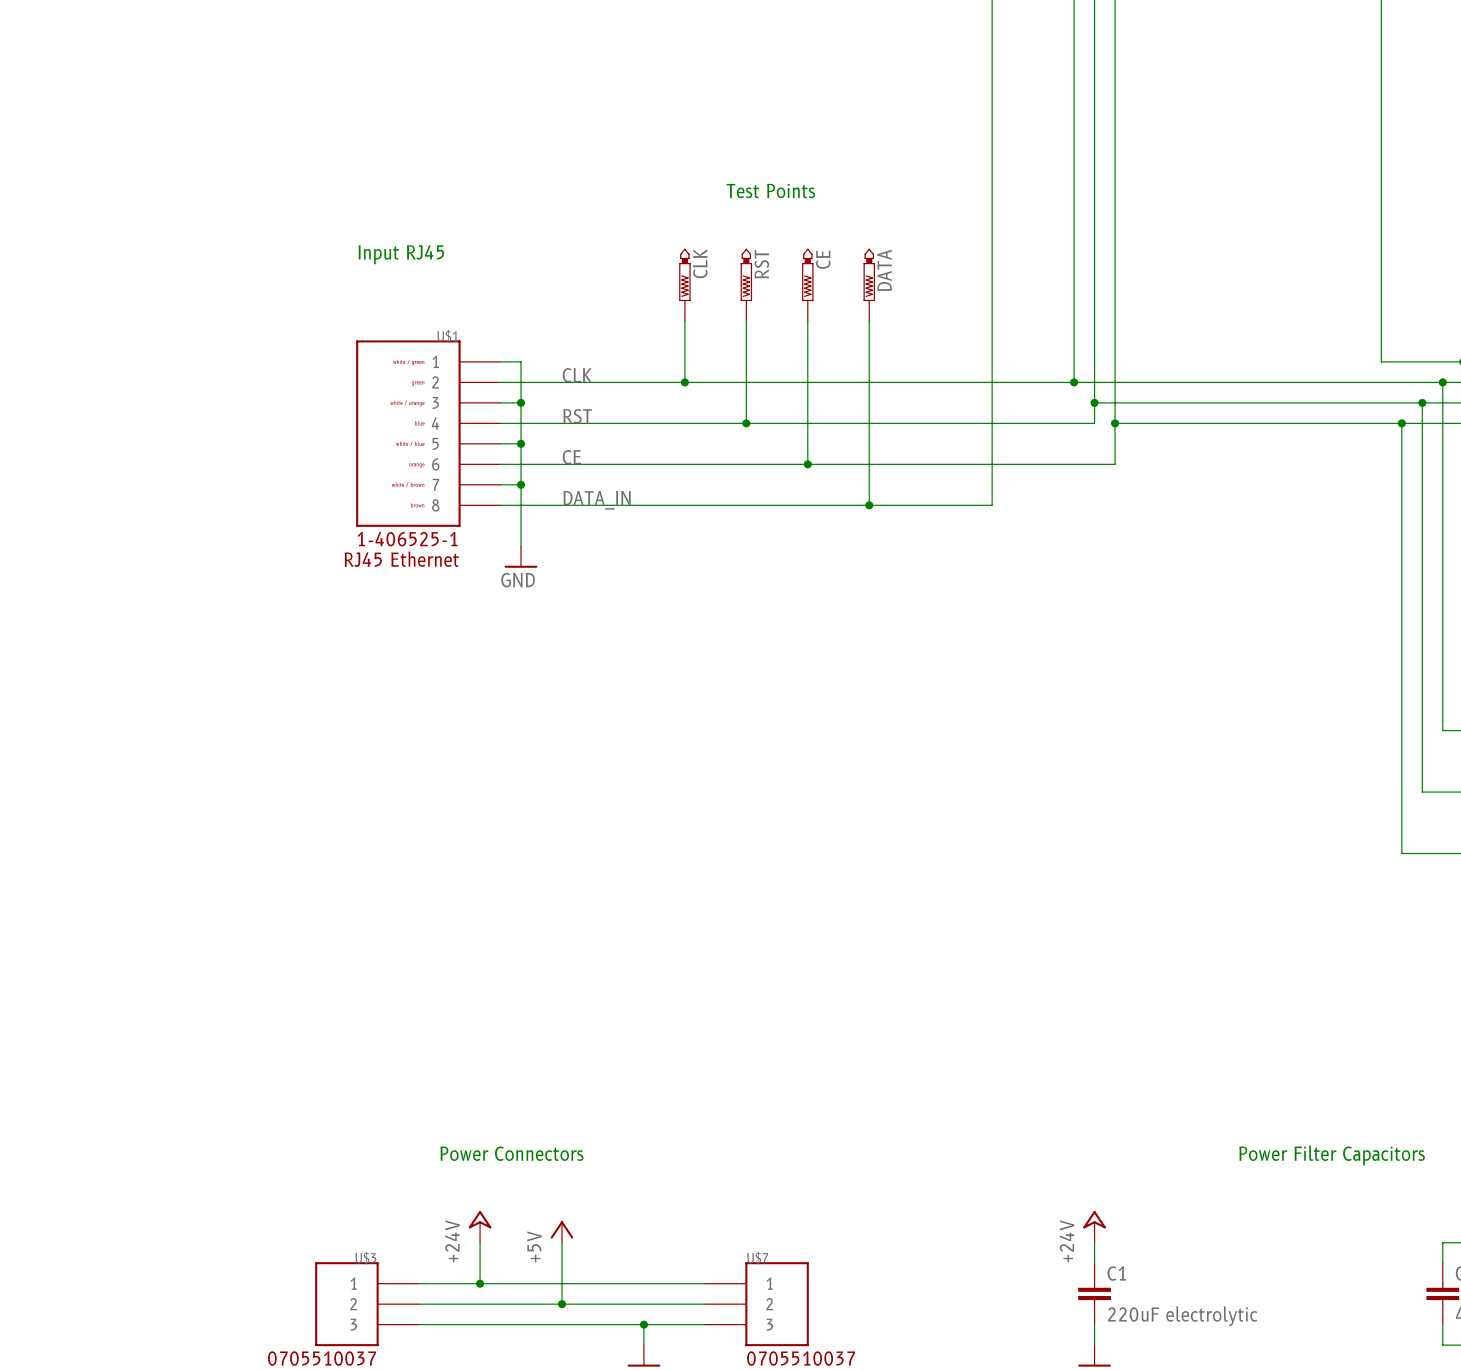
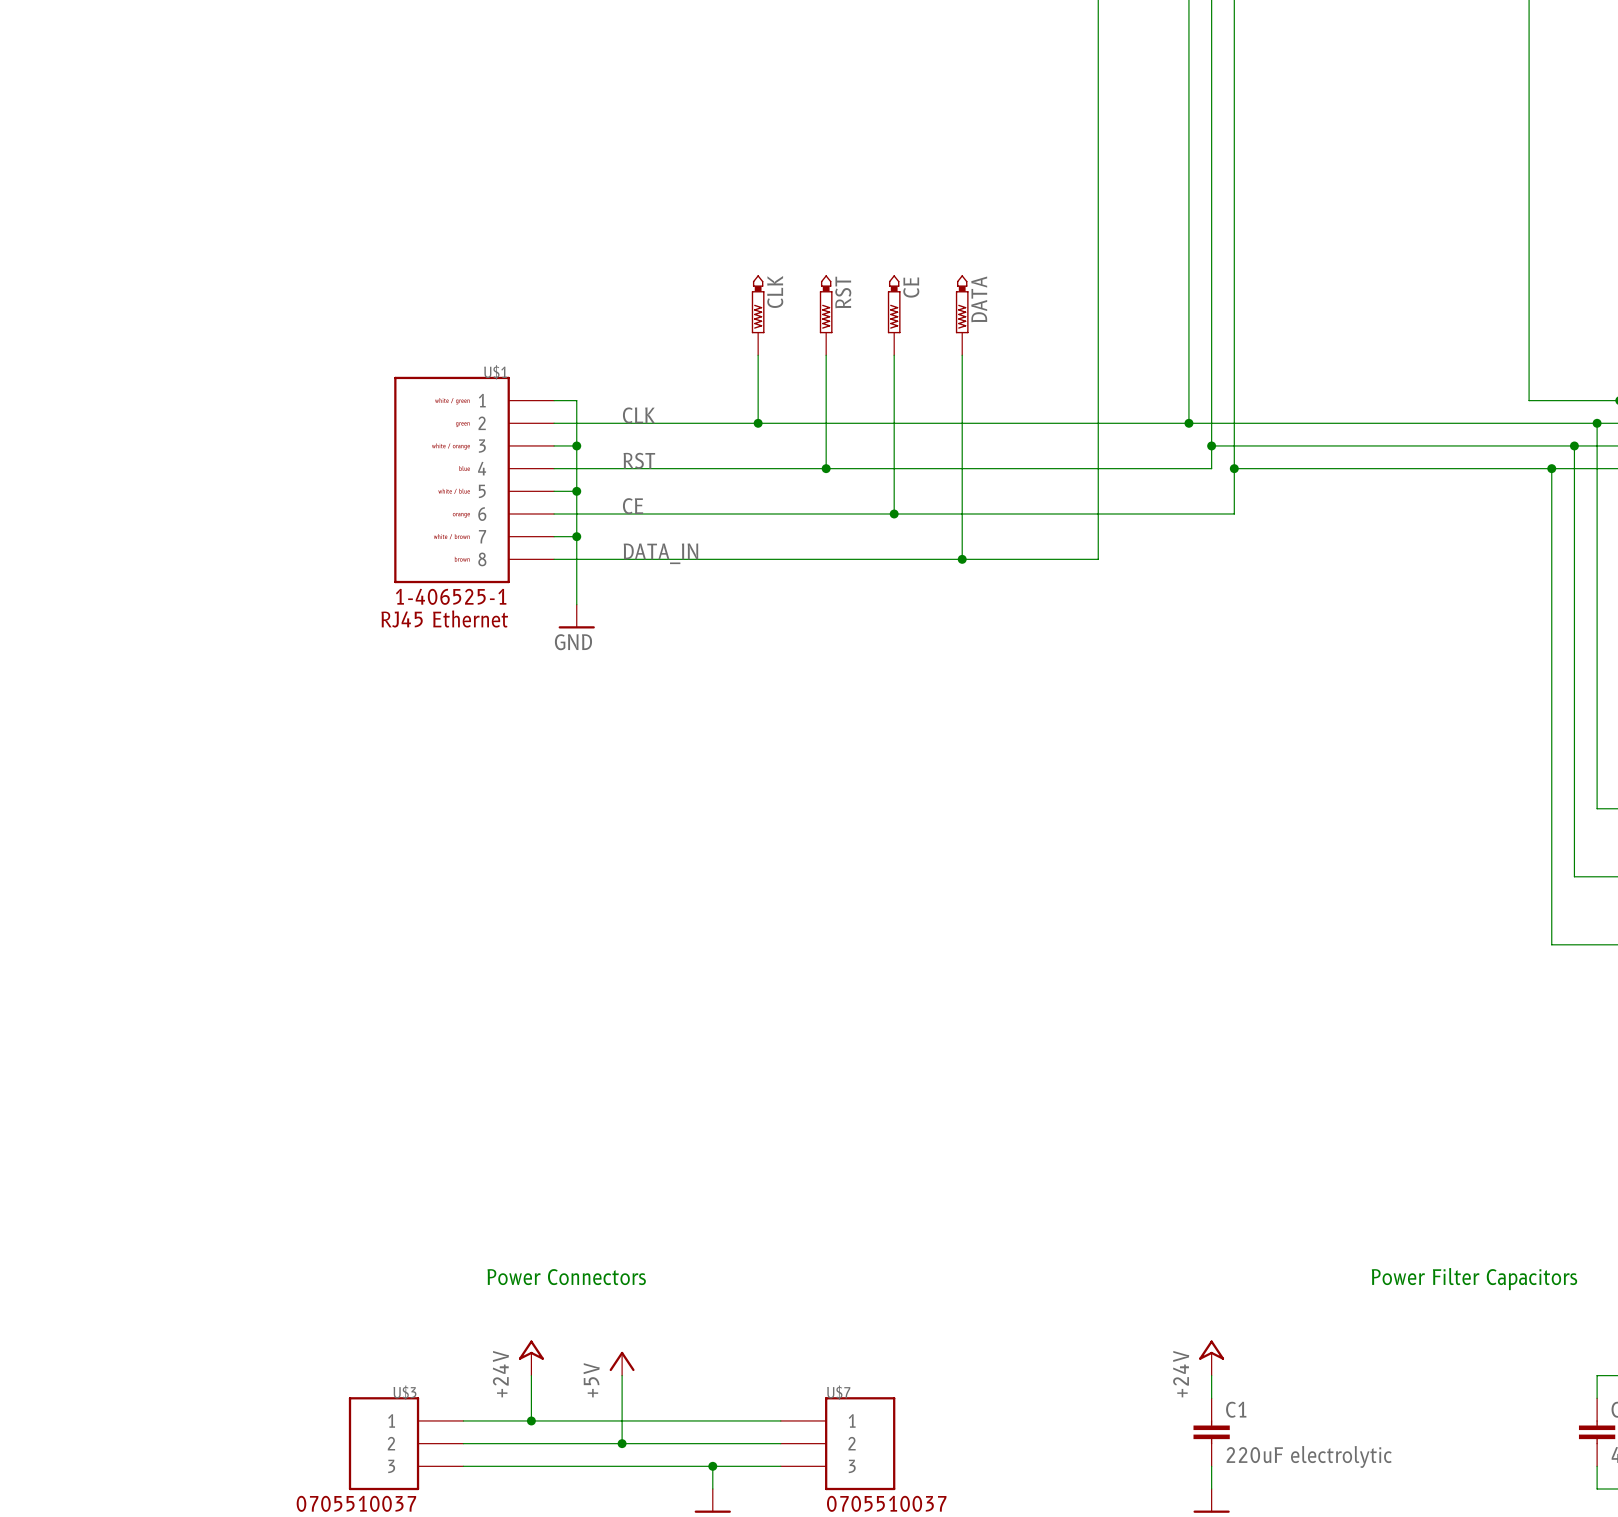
text: Test Points (770, 190) -> none
text: Input RJ45 (401, 254) -> none

